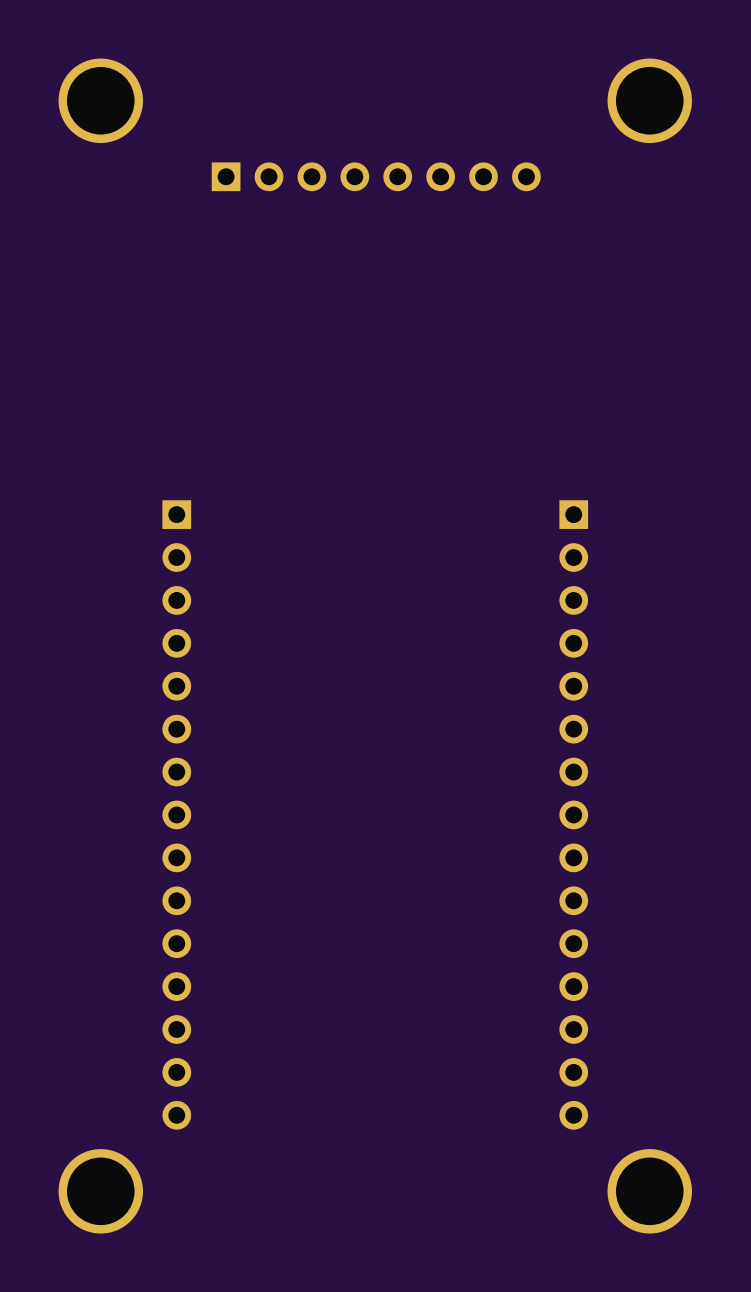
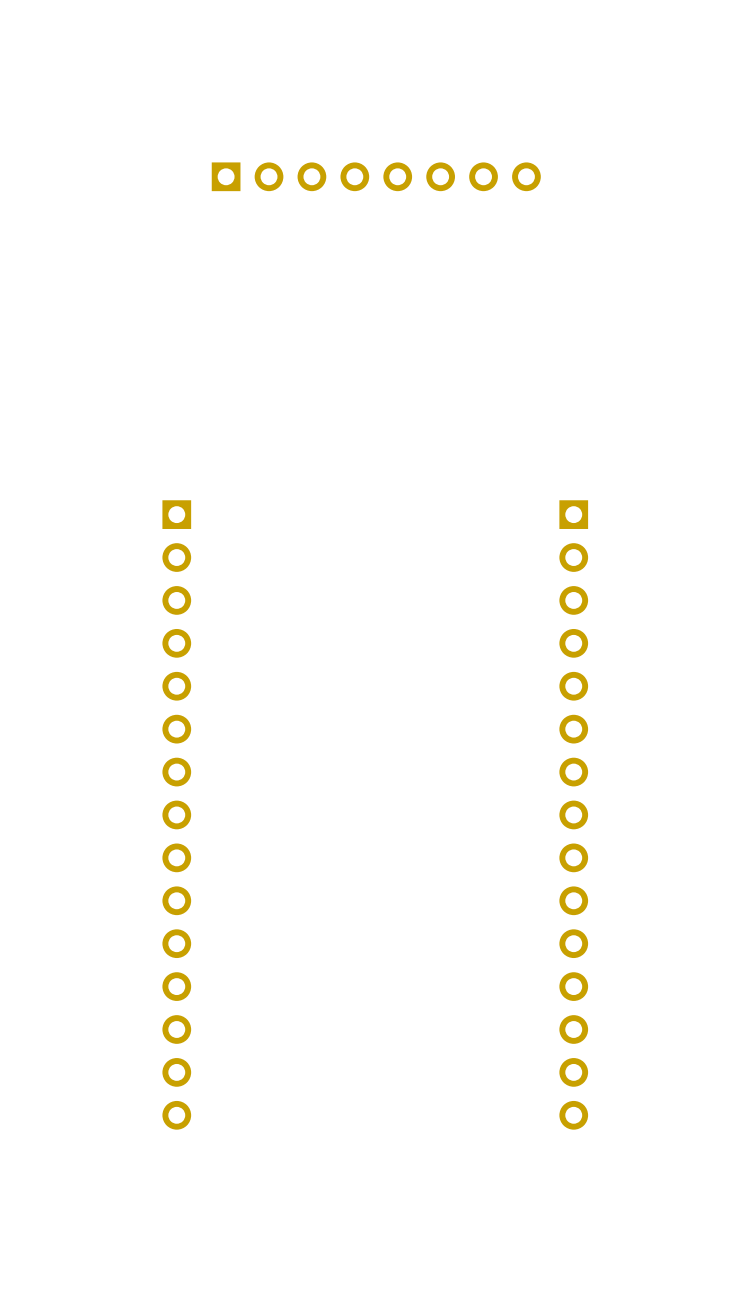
part: (100, 100) -> none
part: (649, 100) -> none
part: (100, 1191) -> none
part: (649, 1191) -> none

